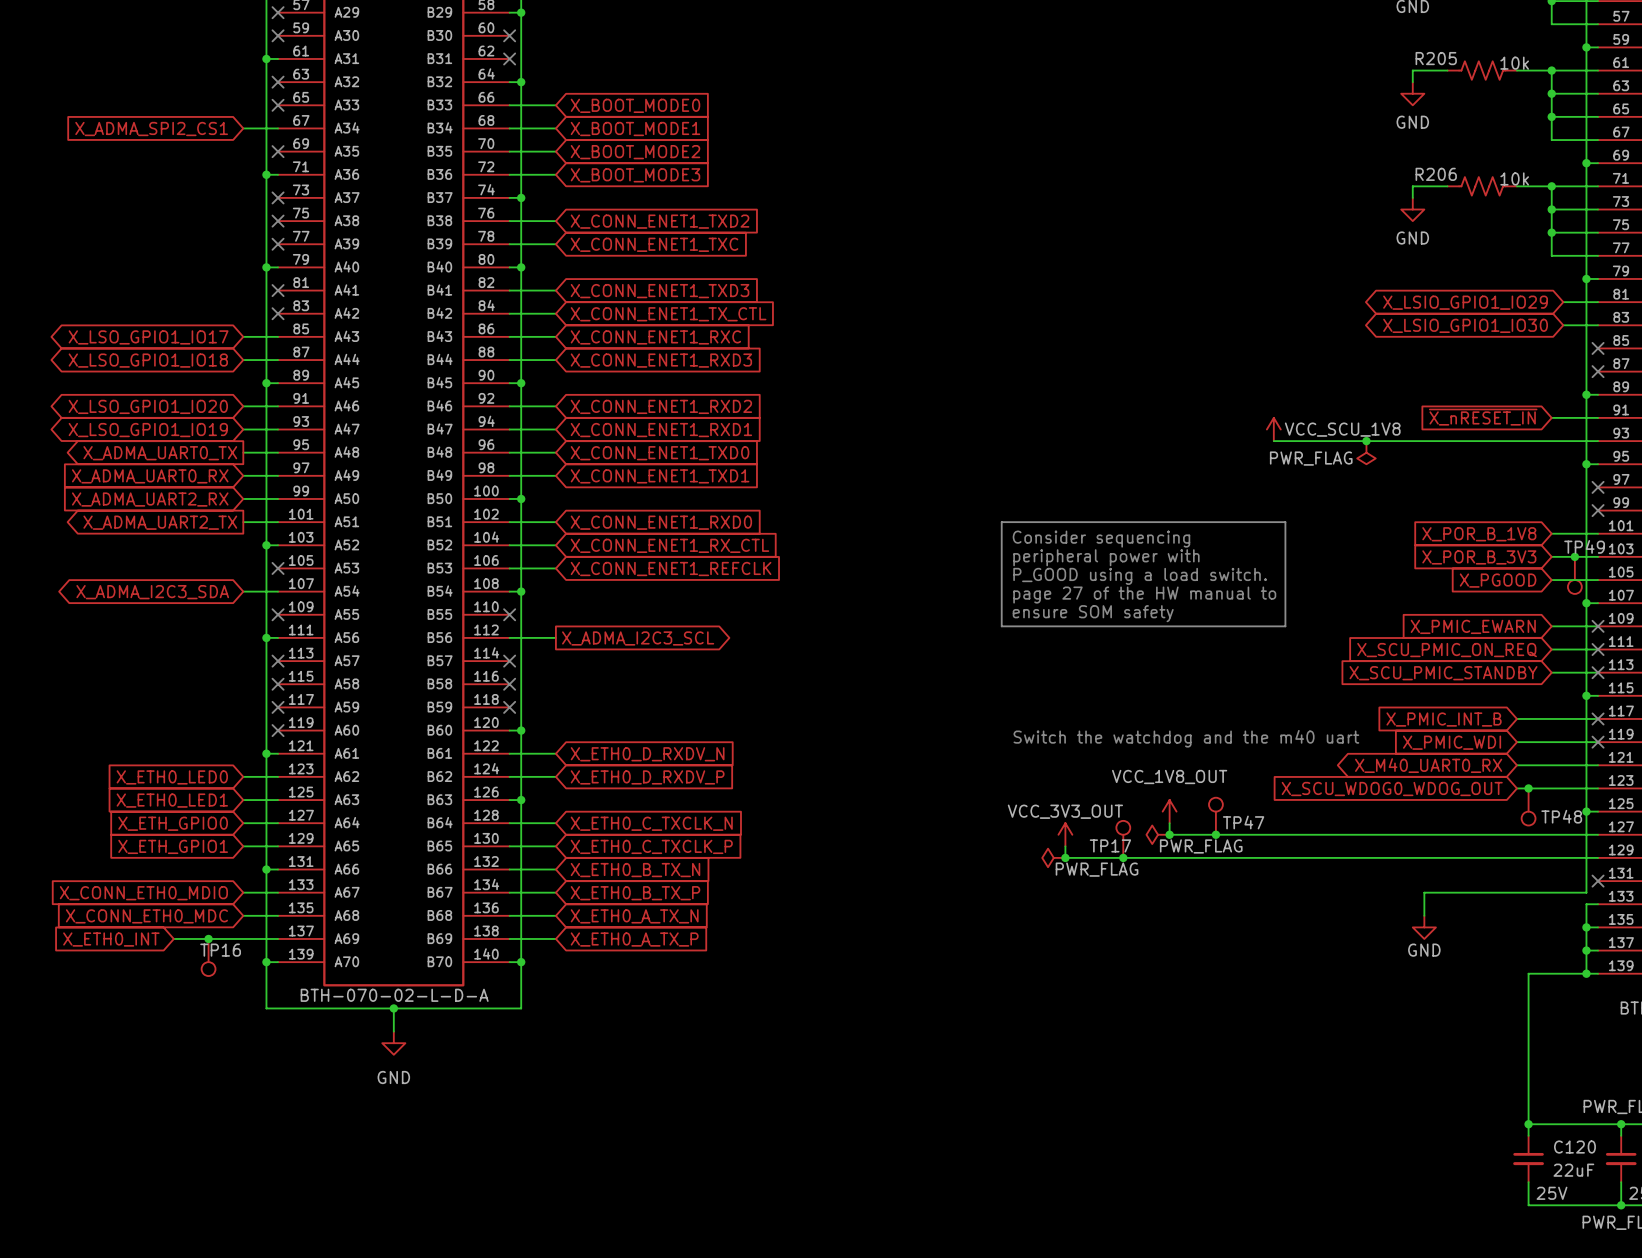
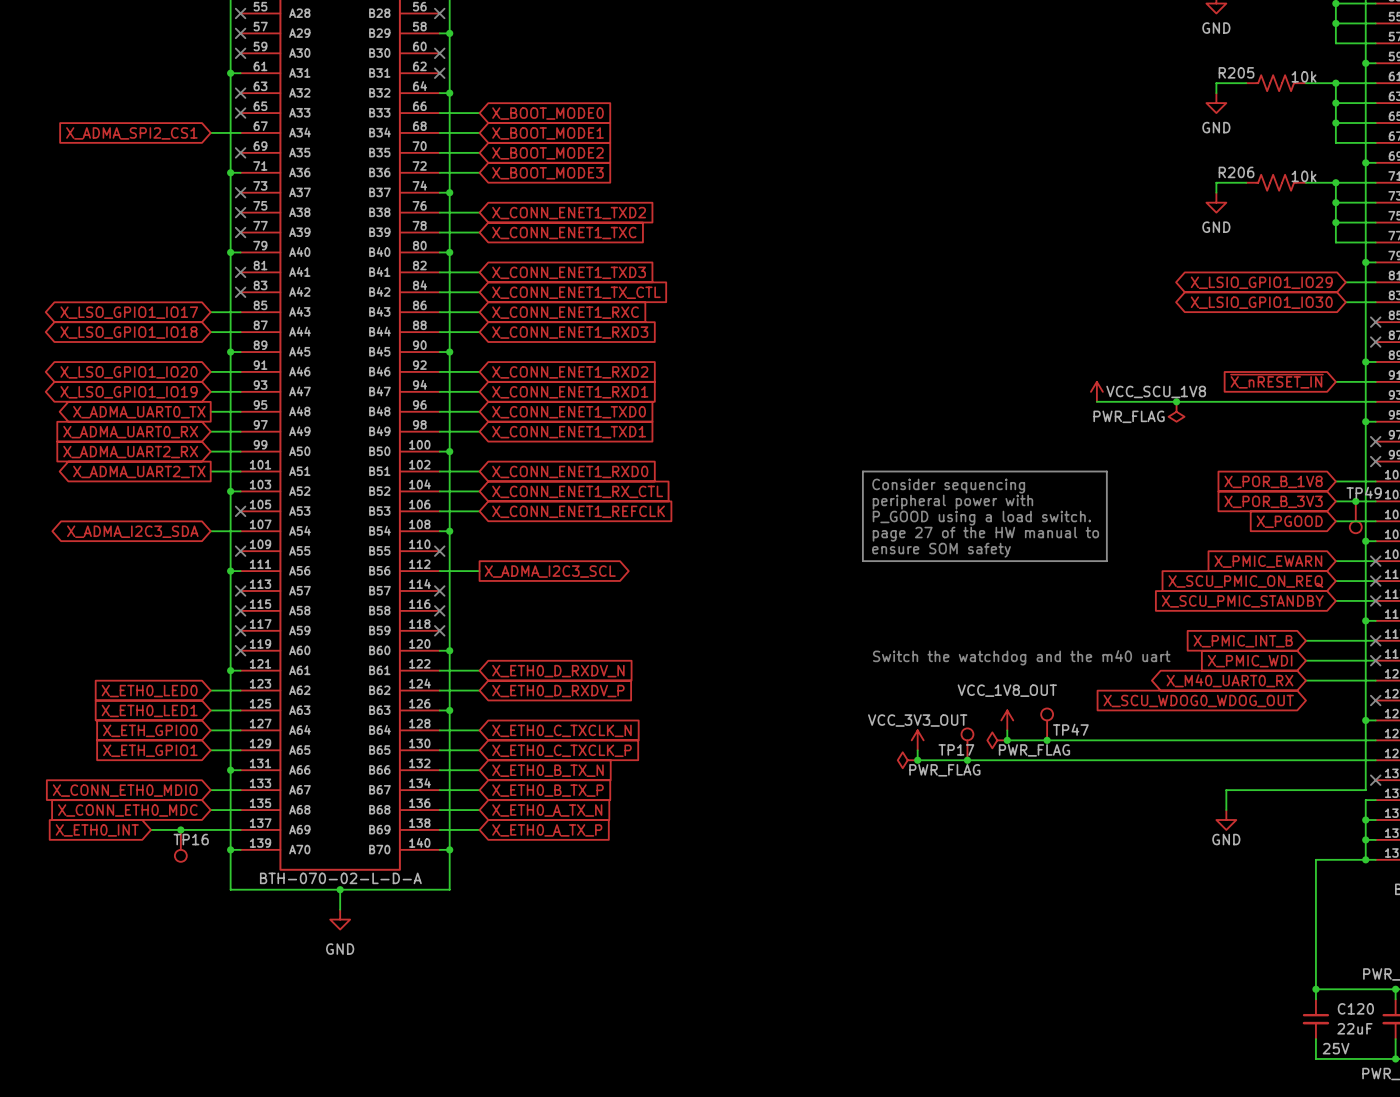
wire: (1516, 788) (1598, 788) -> none
junction: (1528, 788) -> none
no-connect mark: none -> (1375, 700)
TP48: (1528, 806) -> none

